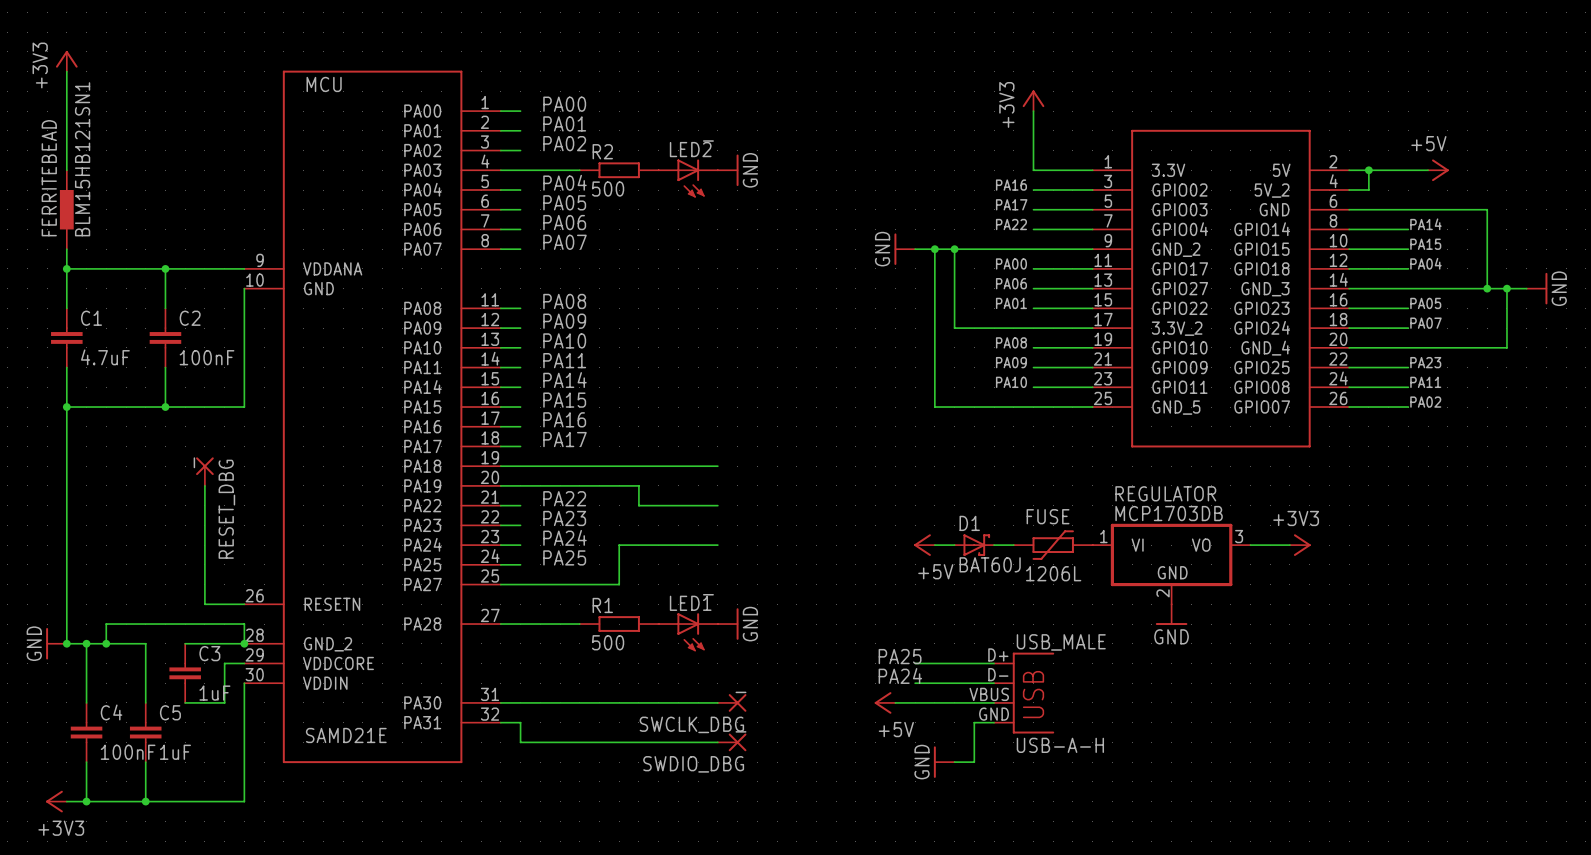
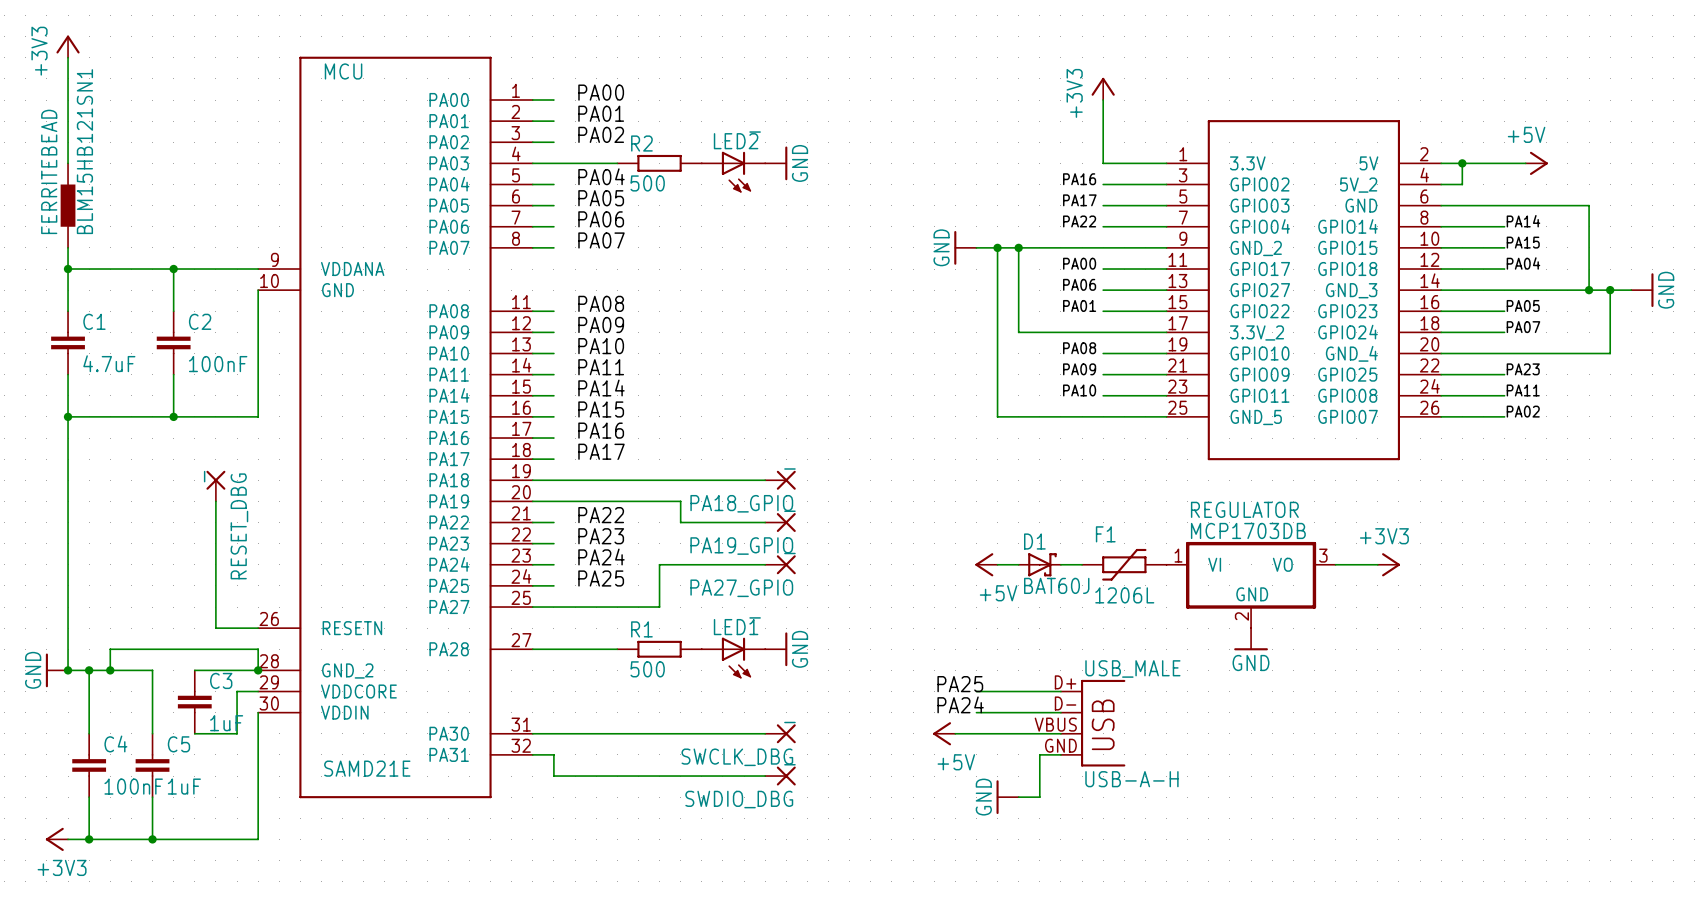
PA18_GPIO: none -> _ (780, 480)
PA19_GPIO: none -> _ (780, 522)
FUSE name: FUSE (1048, 516) -> F1 (1105, 534)
PA27_GPIO: none -> _ (780, 564)

